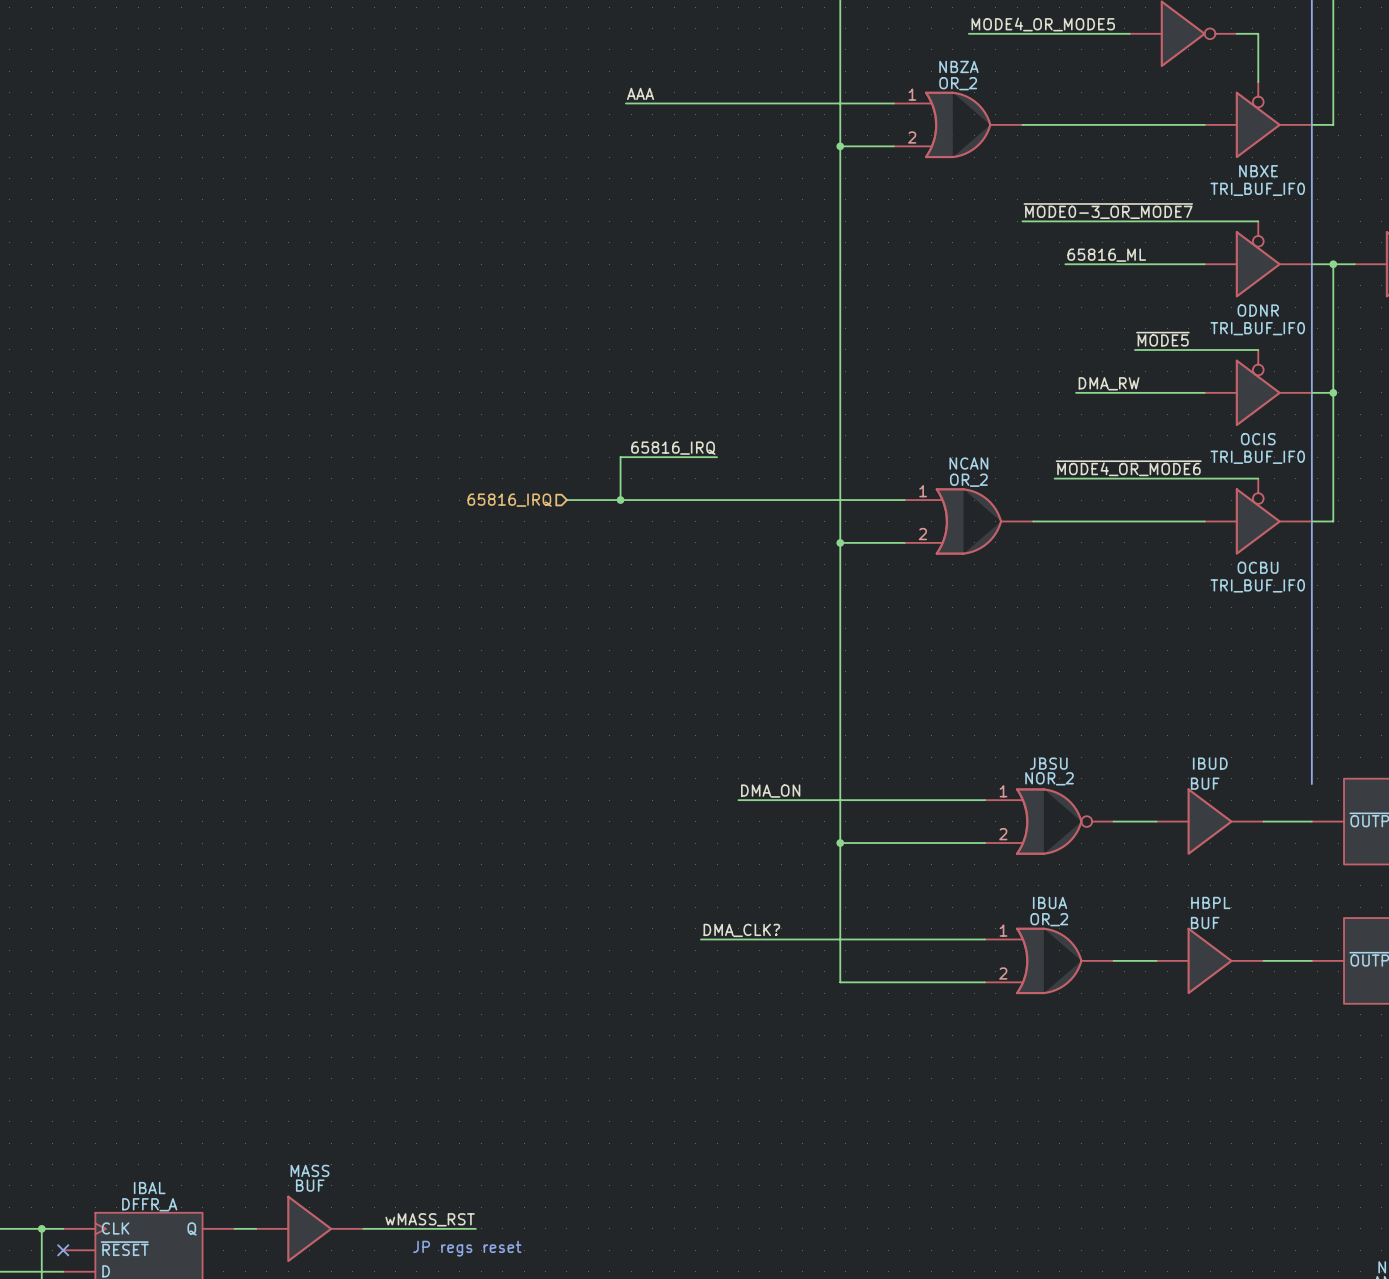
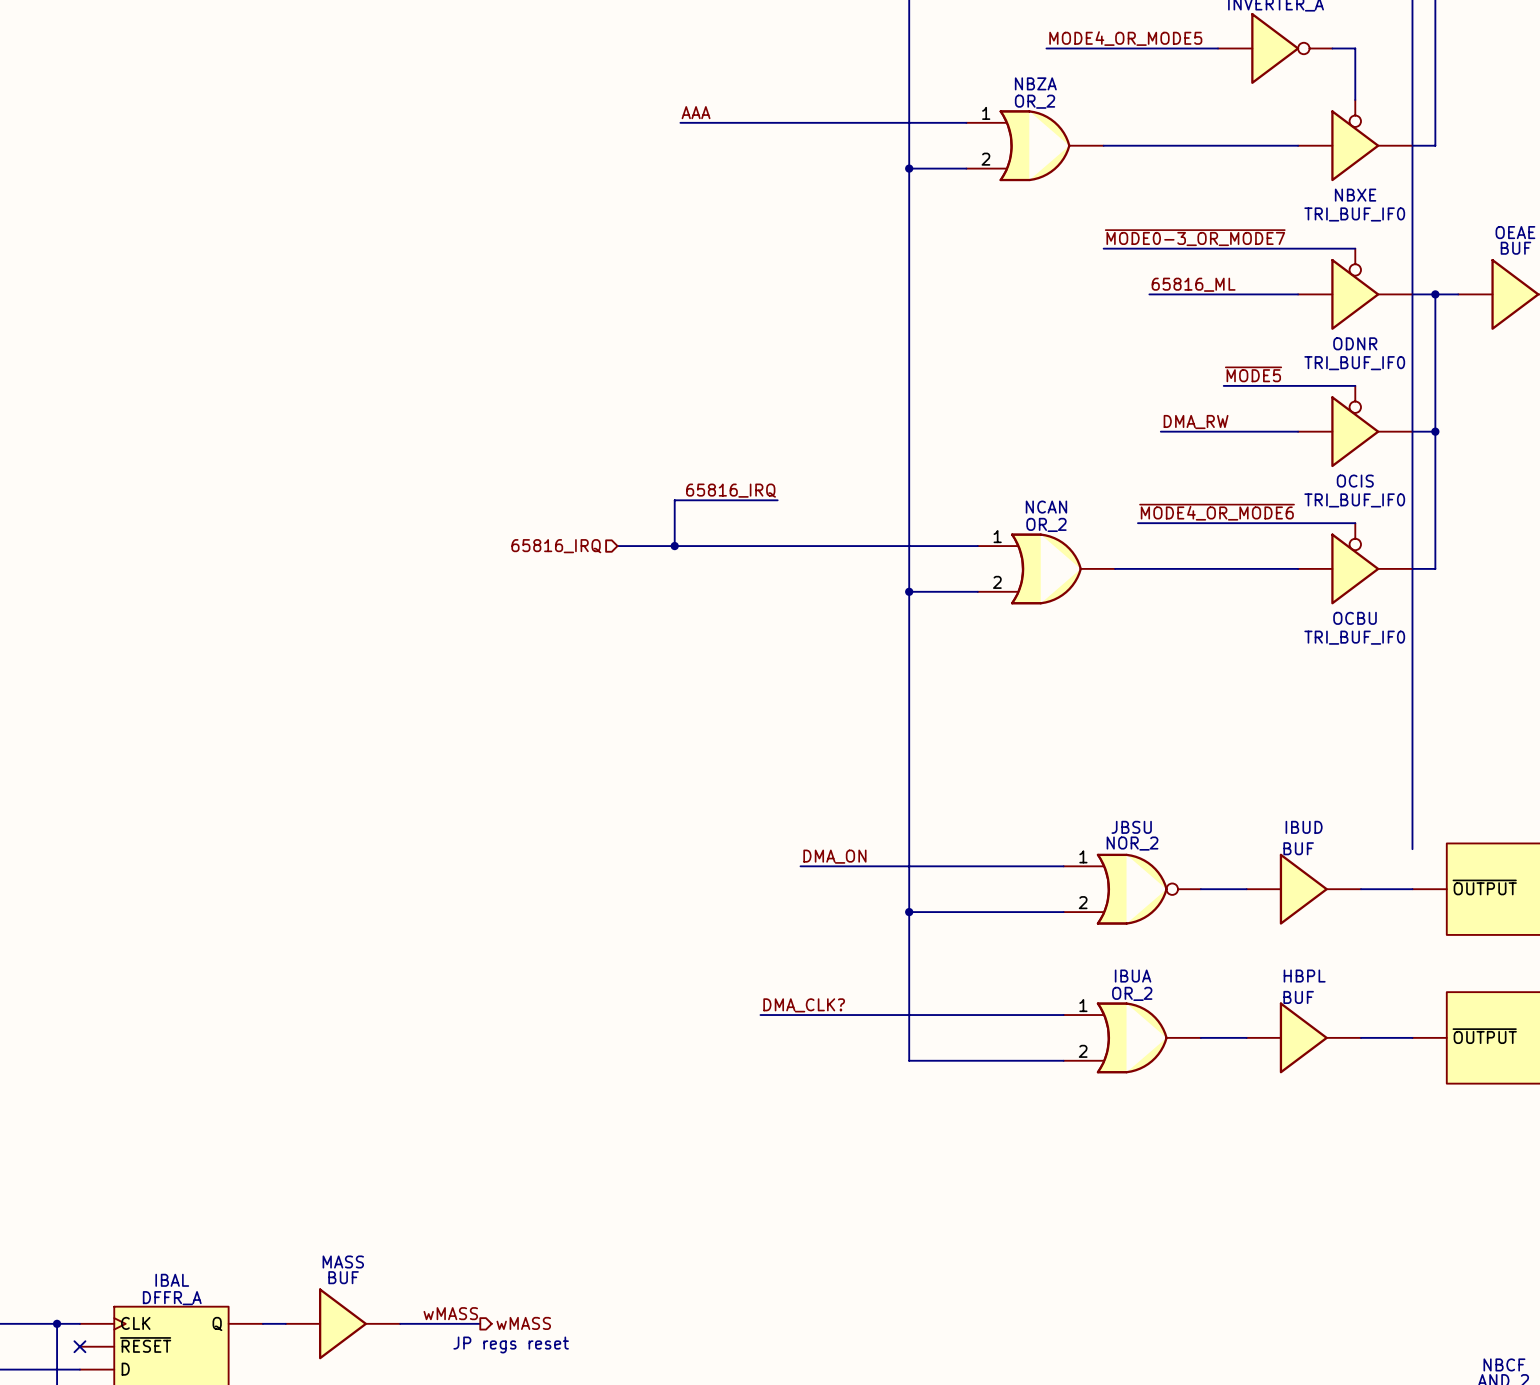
label: wMASS_RST (430, 1219) -> wMASS (450, 1313)
wire: (438, 1228) (475, 1228) -> none
hierarchical label: none -> wMASS (523, 1323)

